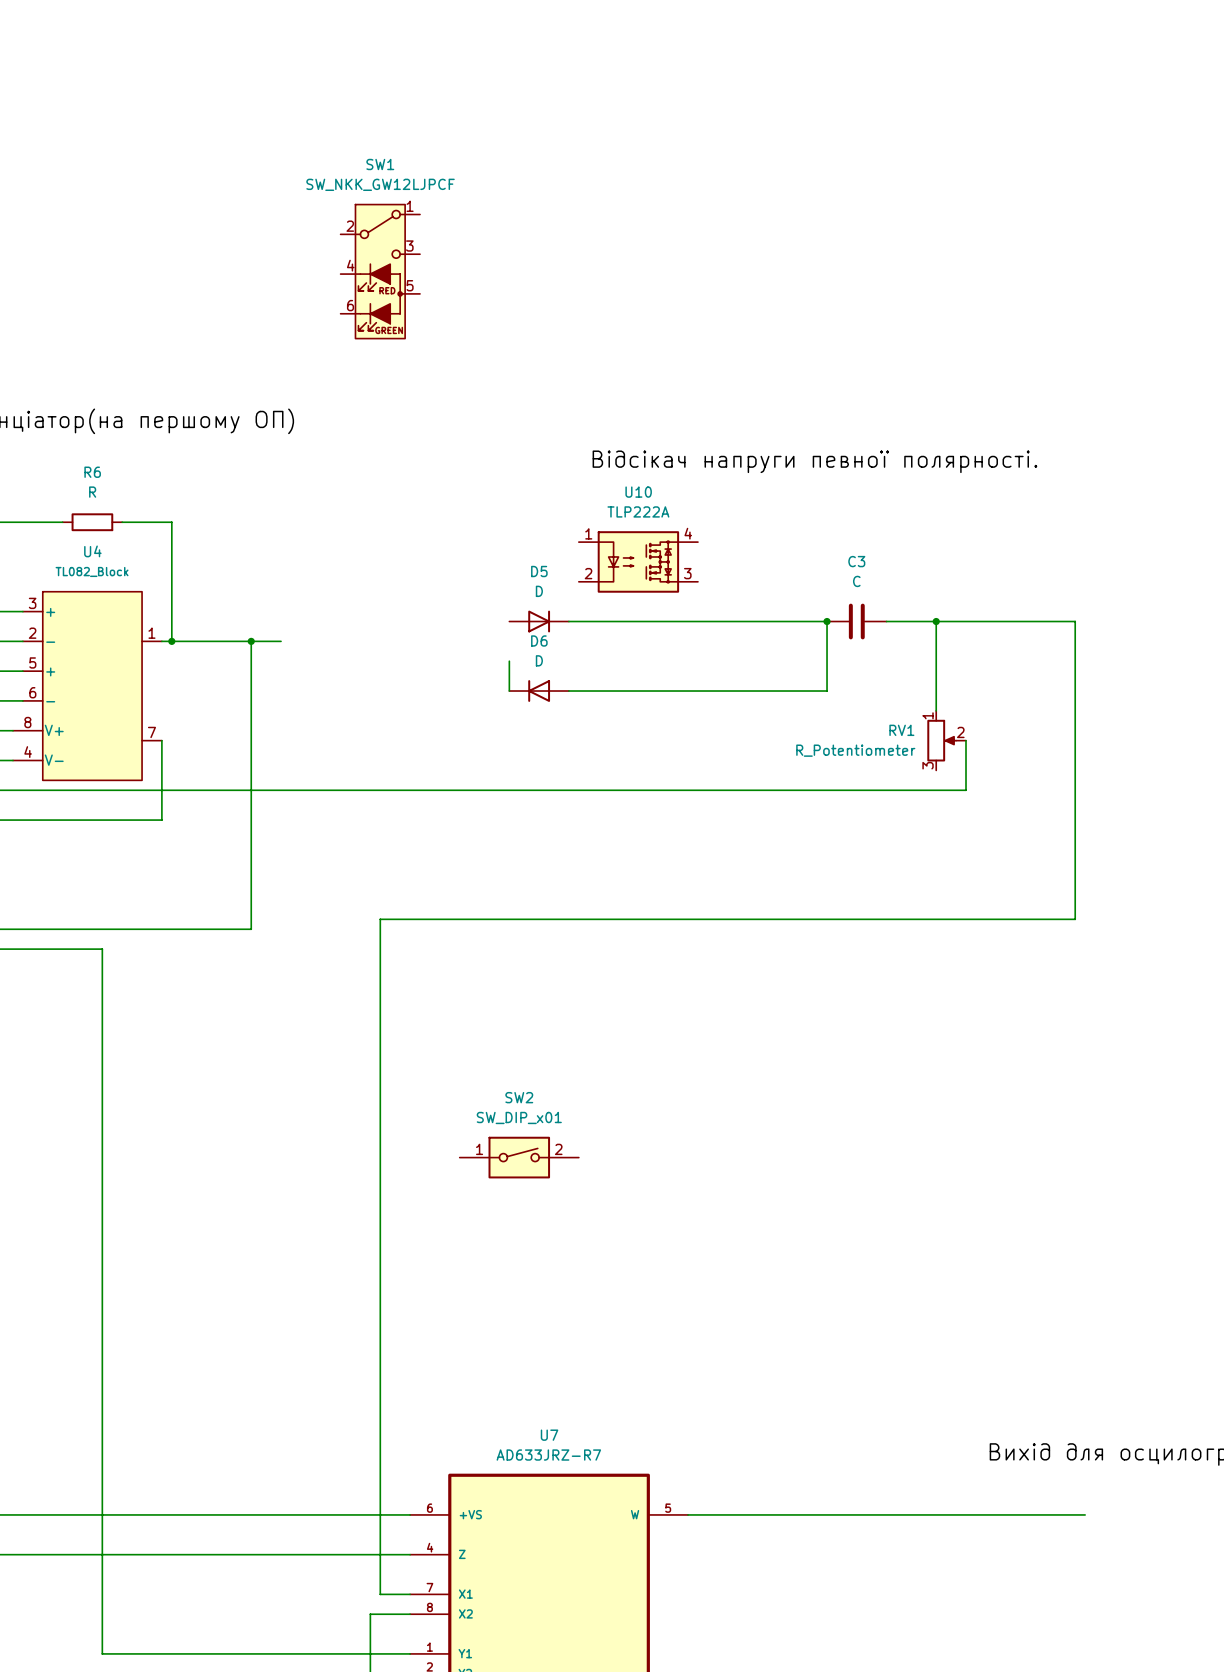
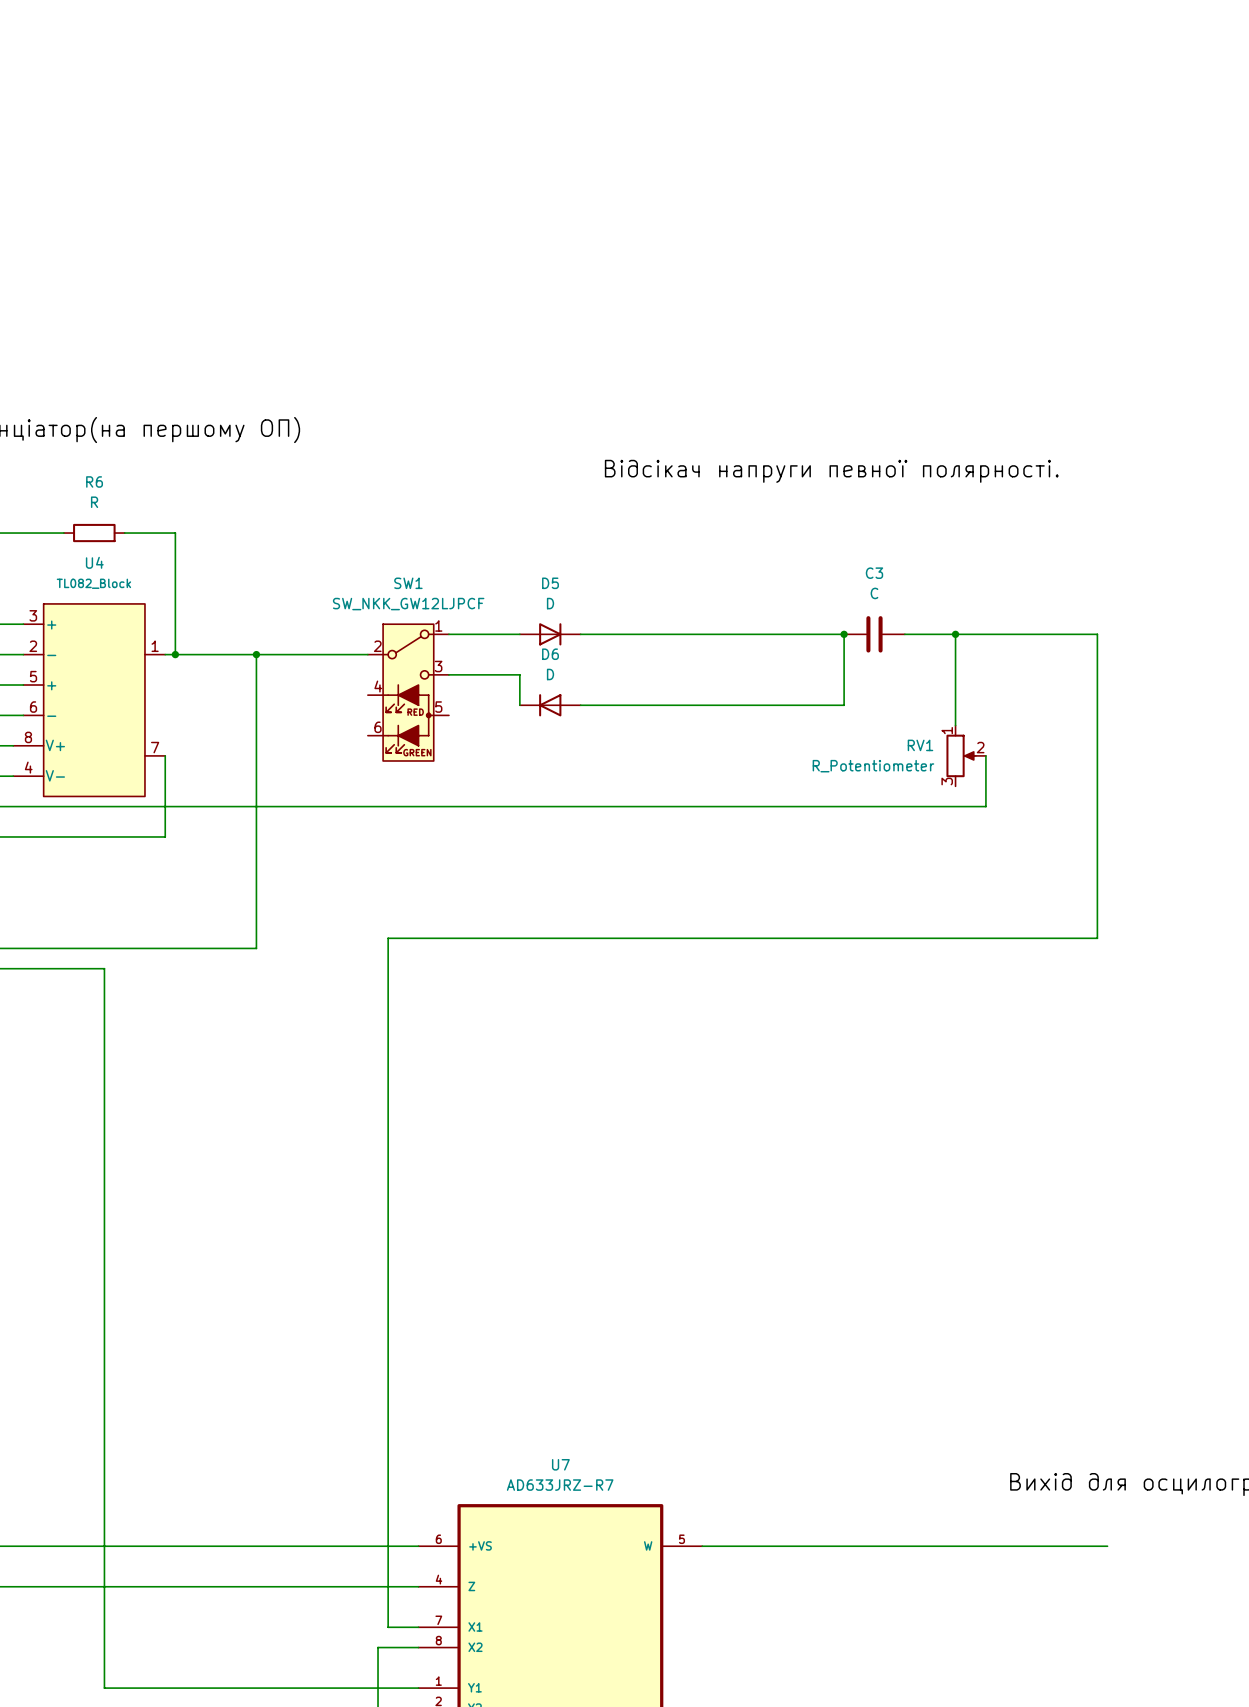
SW1 position: (380, 271) -> (408, 692)
U10: TLP222A (638, 561) -> none
wire: none -> (448, 634) (519, 634)
wire: none -> (286, 654) (367, 654)
wire: none -> (448, 674) (519, 674)
SW2: SW_DIP_x01 (519, 1157) -> none

